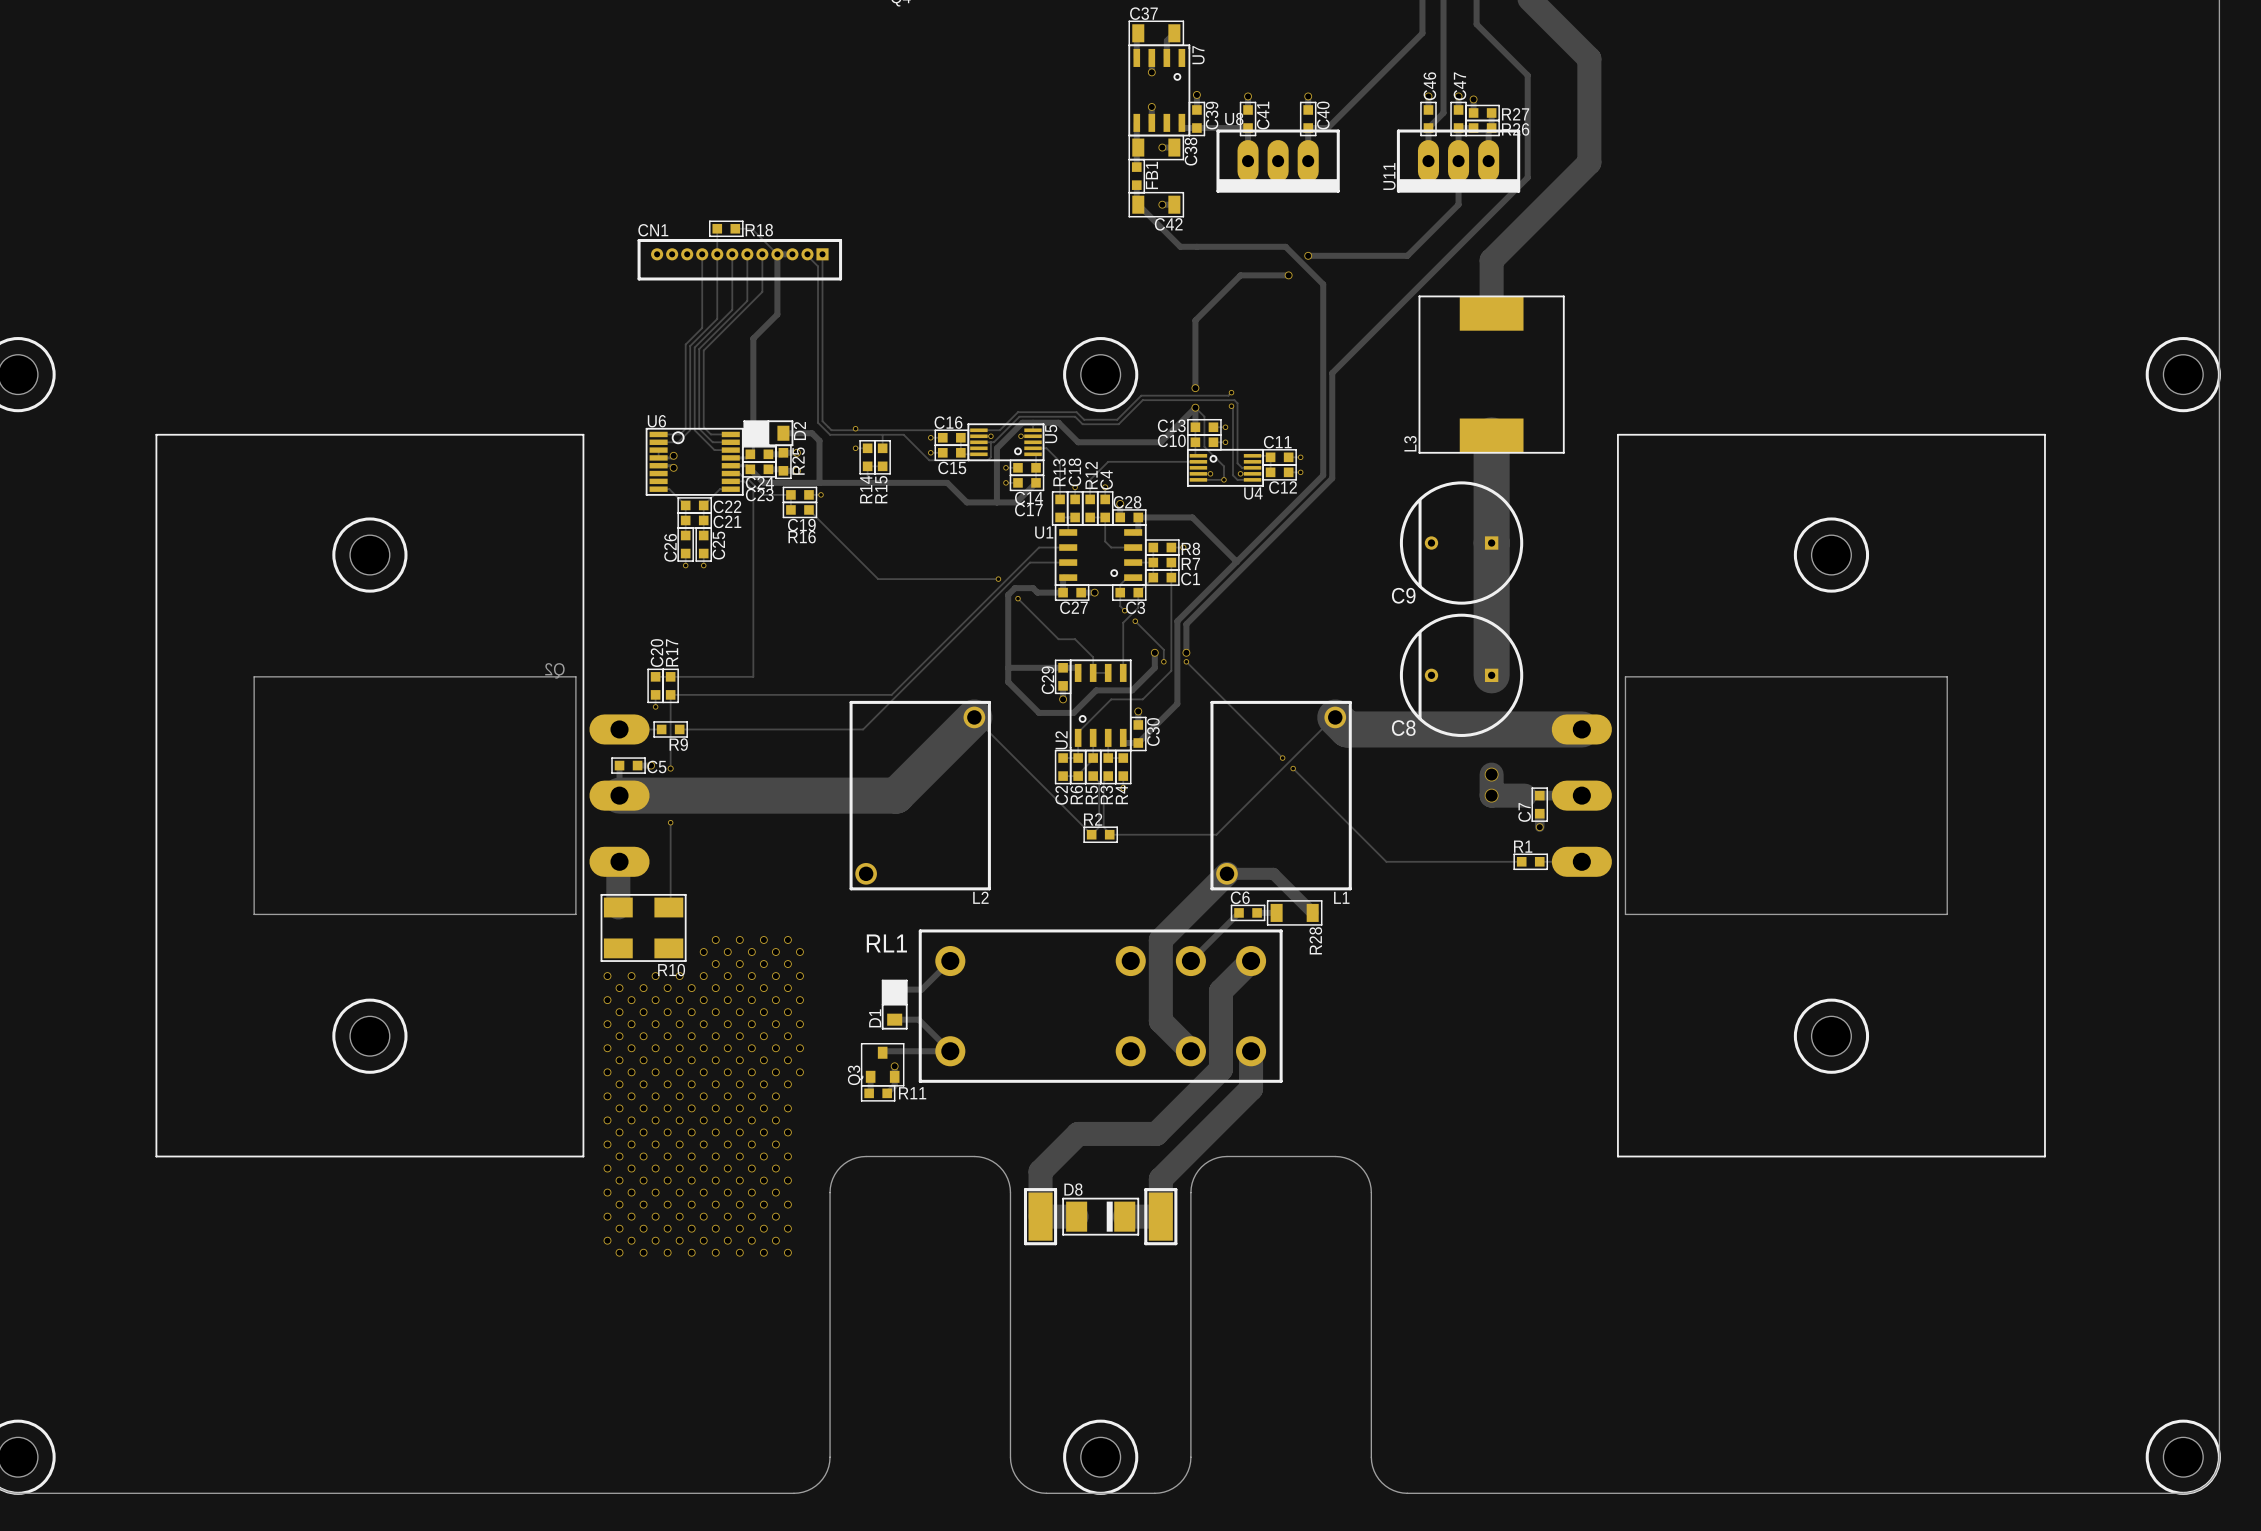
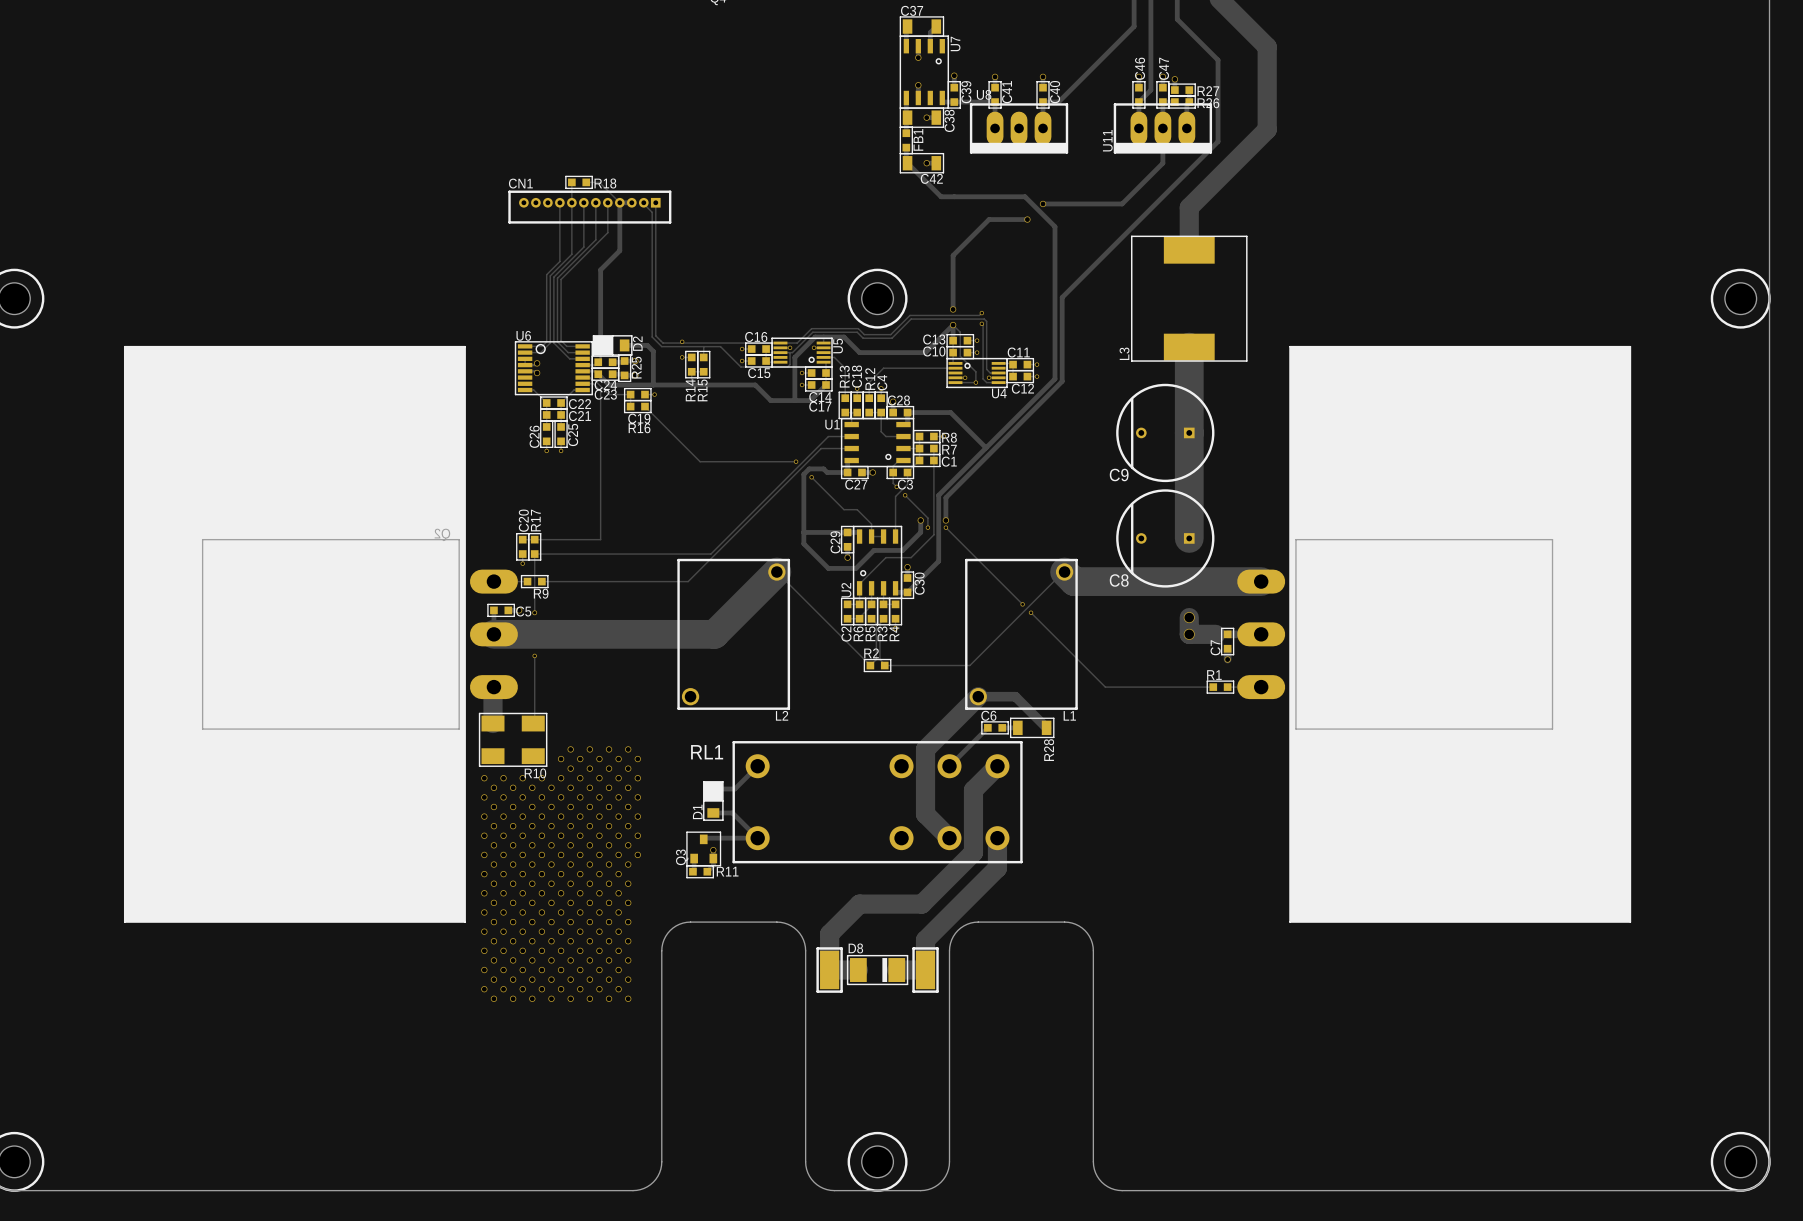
drawing: none -> [124, 346, 466, 923]
drawing: none -> [1289, 346, 1631, 923]

